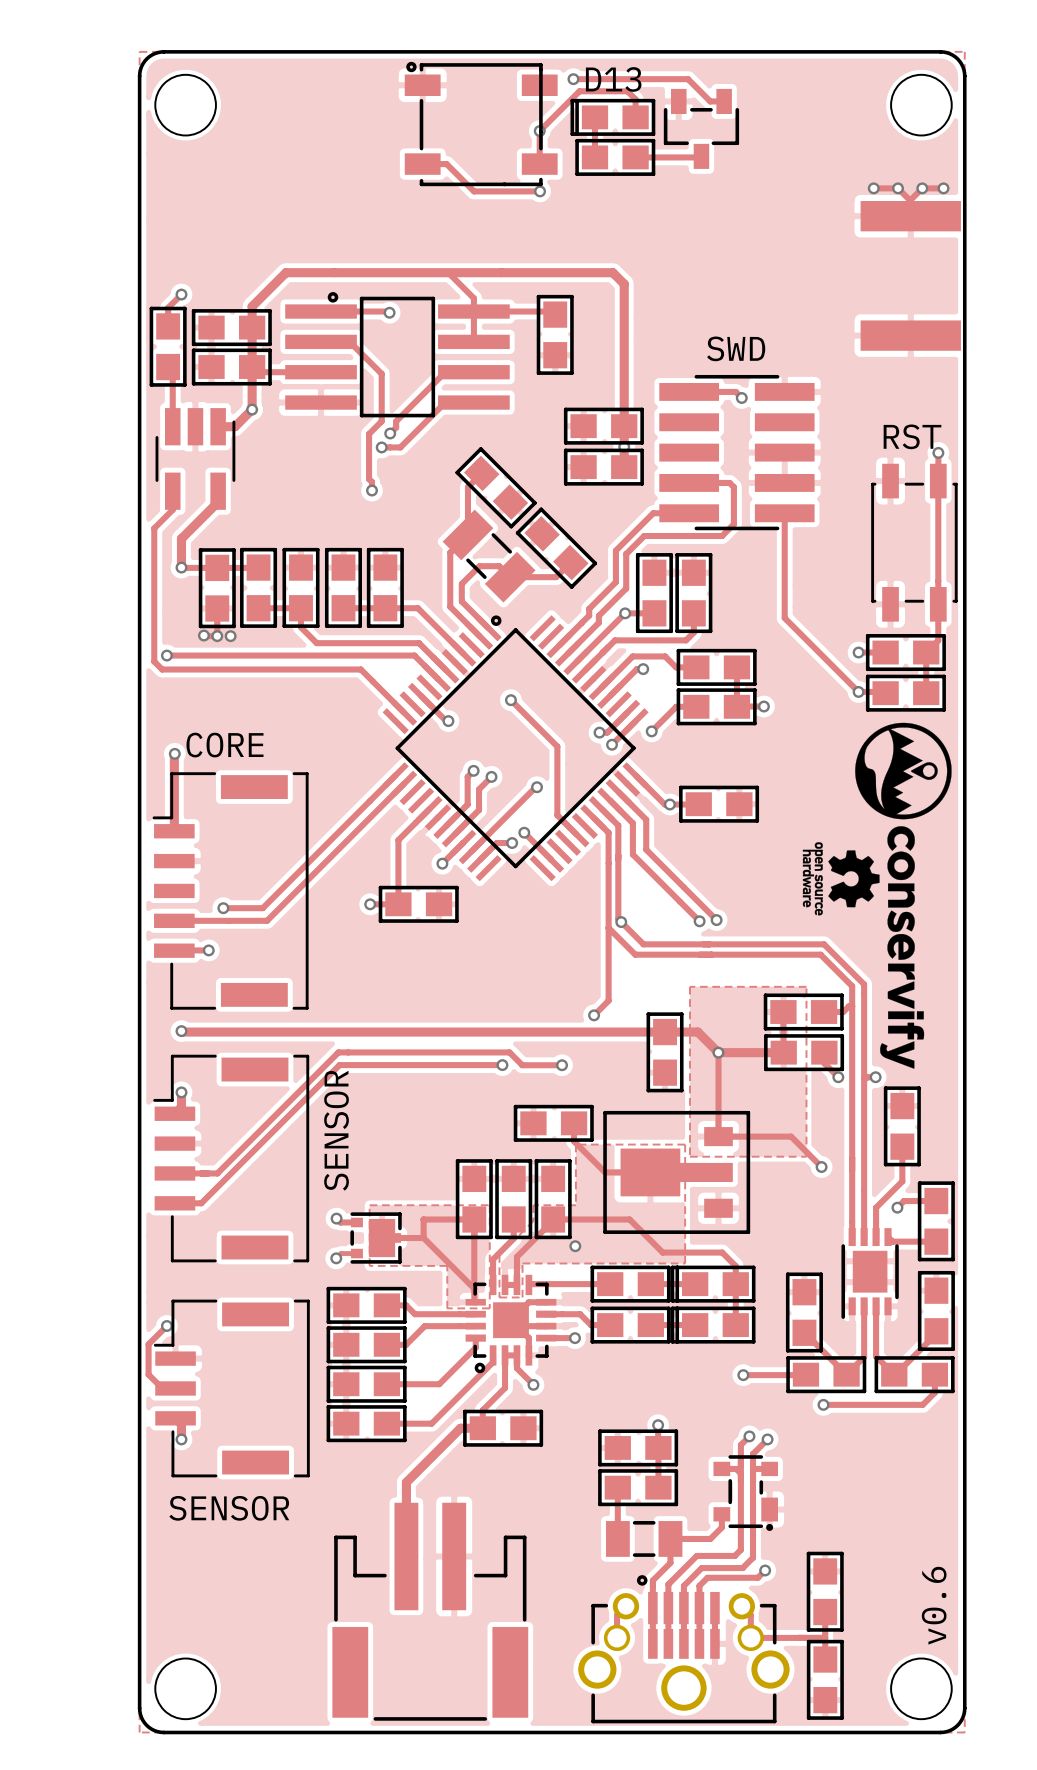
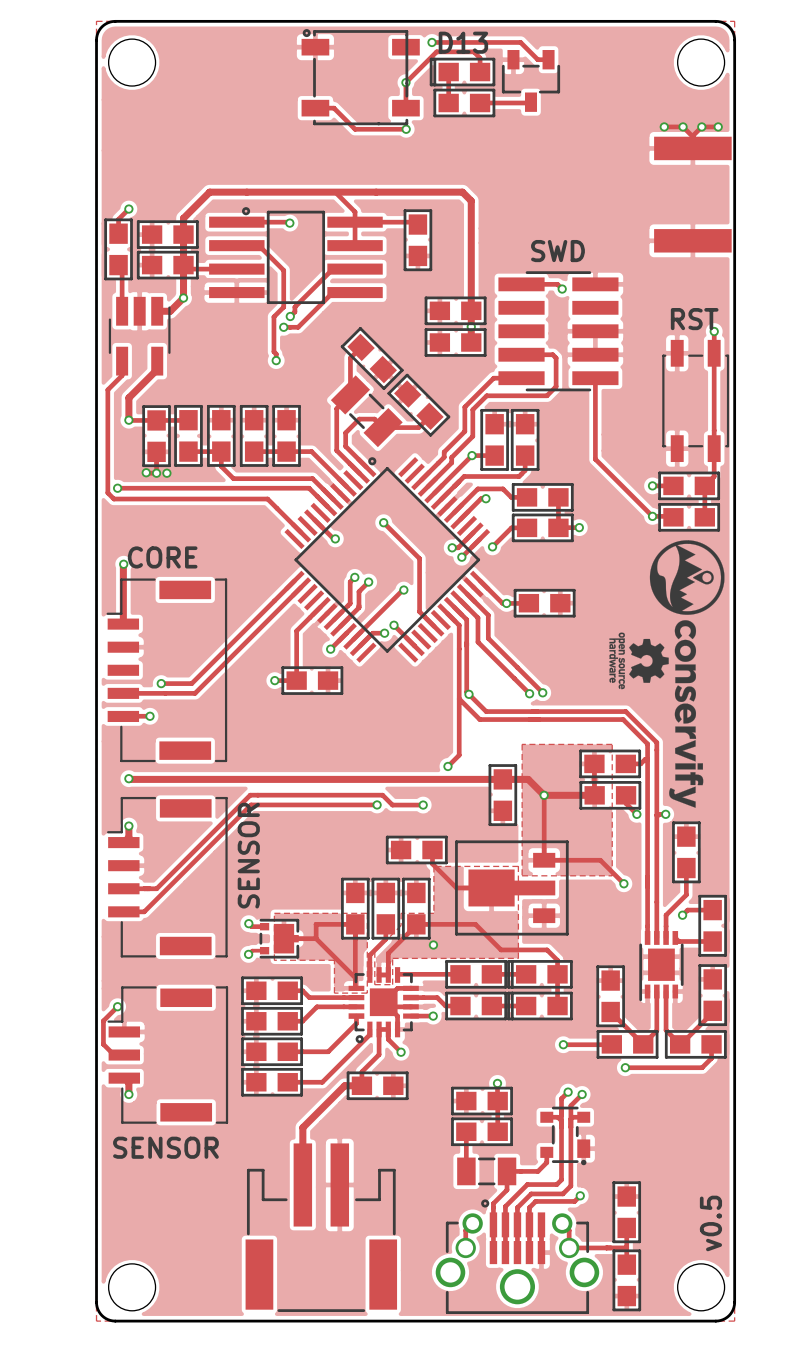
text: v0.6 (934, 1605) -> v0.5 (710, 1223)

